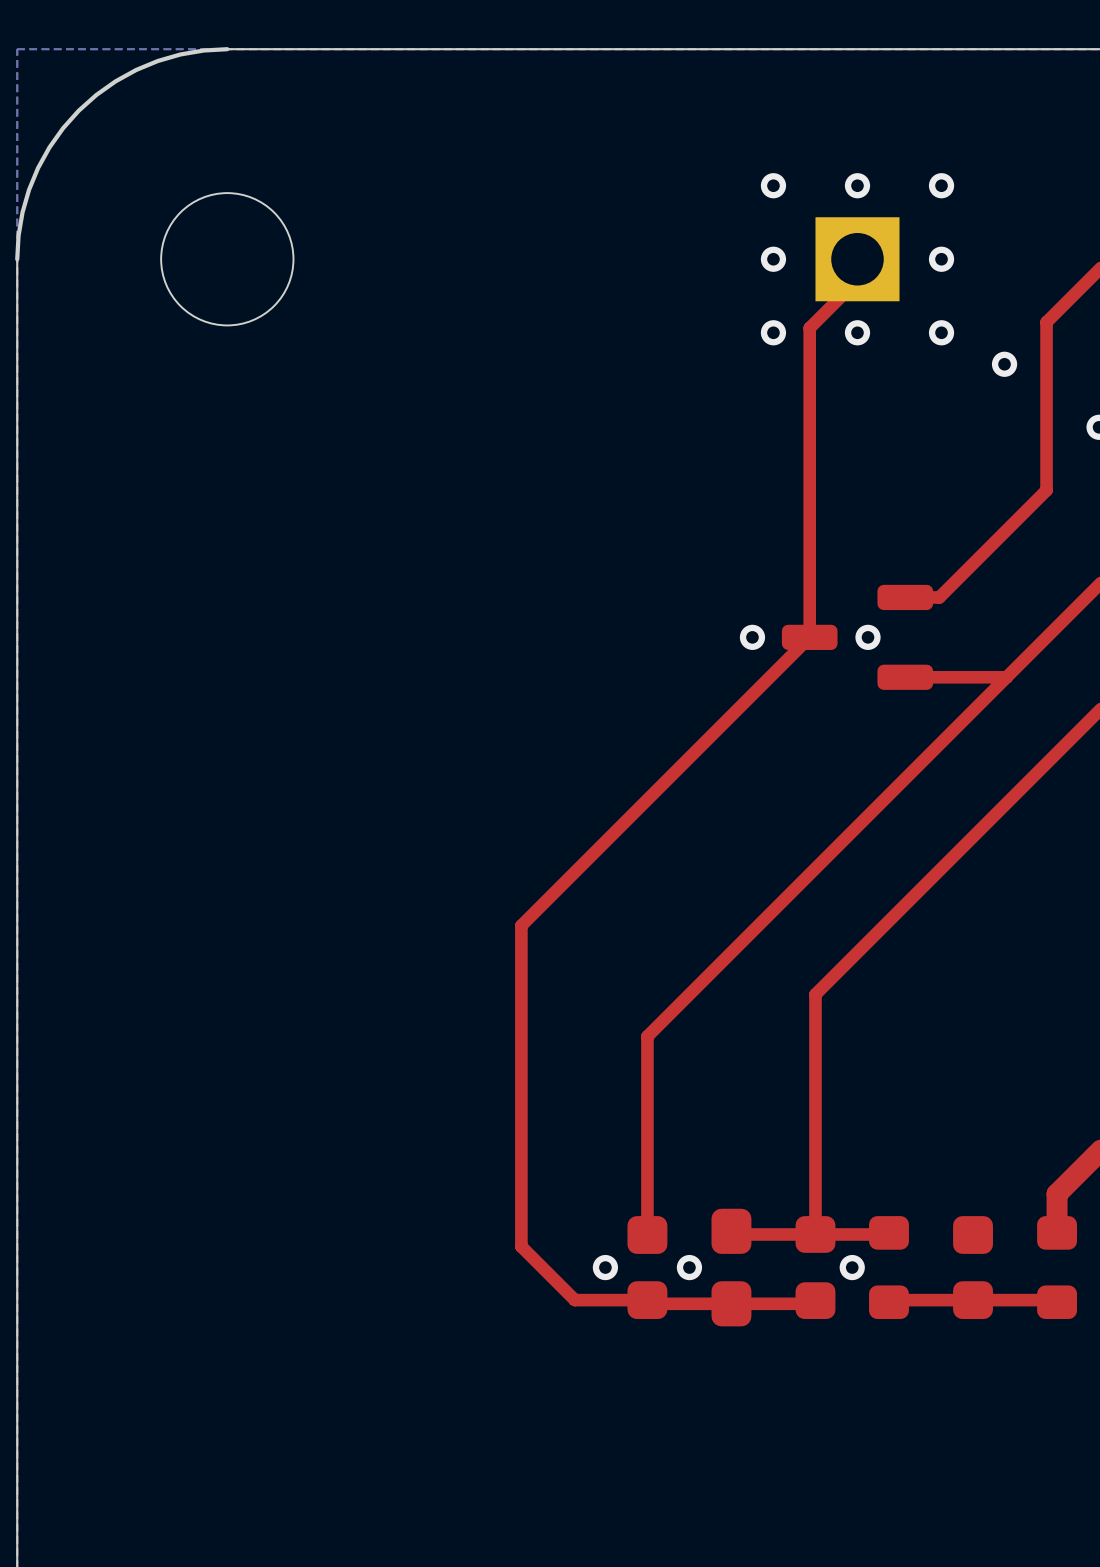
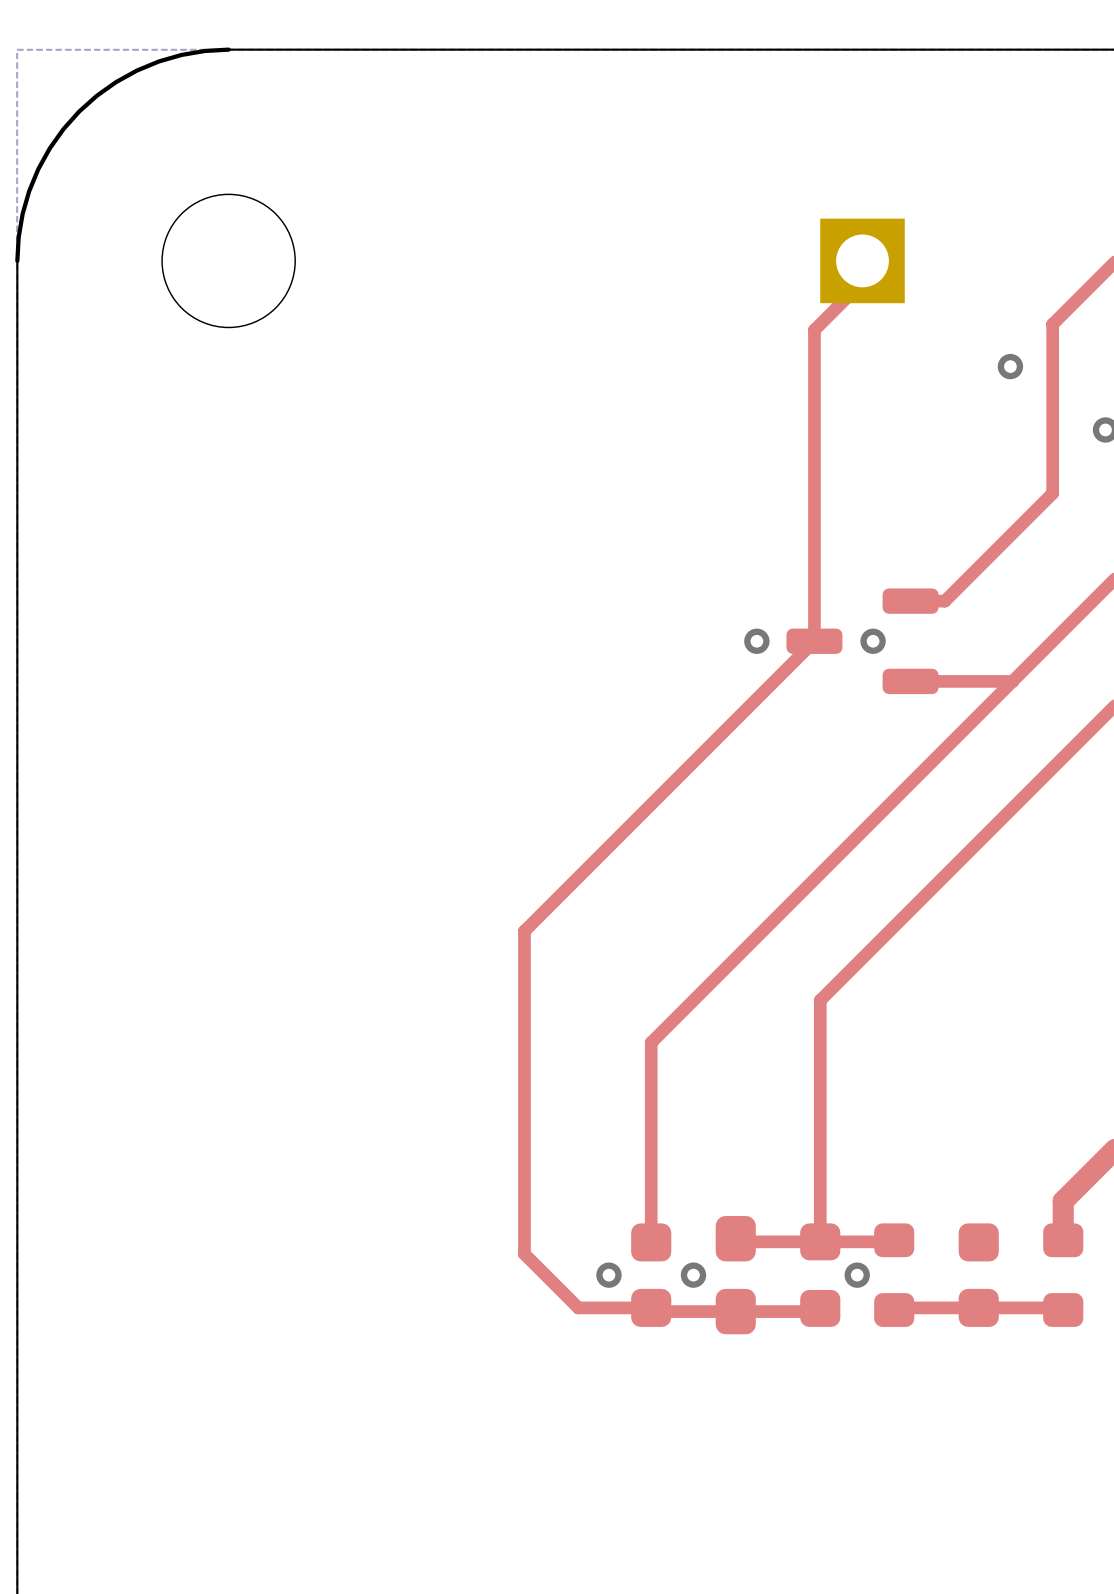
via: (773, 185) -> none
via: (857, 185) -> none
via: (941, 185) -> none
via: (773, 259) -> none
via: (941, 259) -> none
via: (773, 332) -> none
via: (857, 332) -> none
via: (941, 332) -> none

